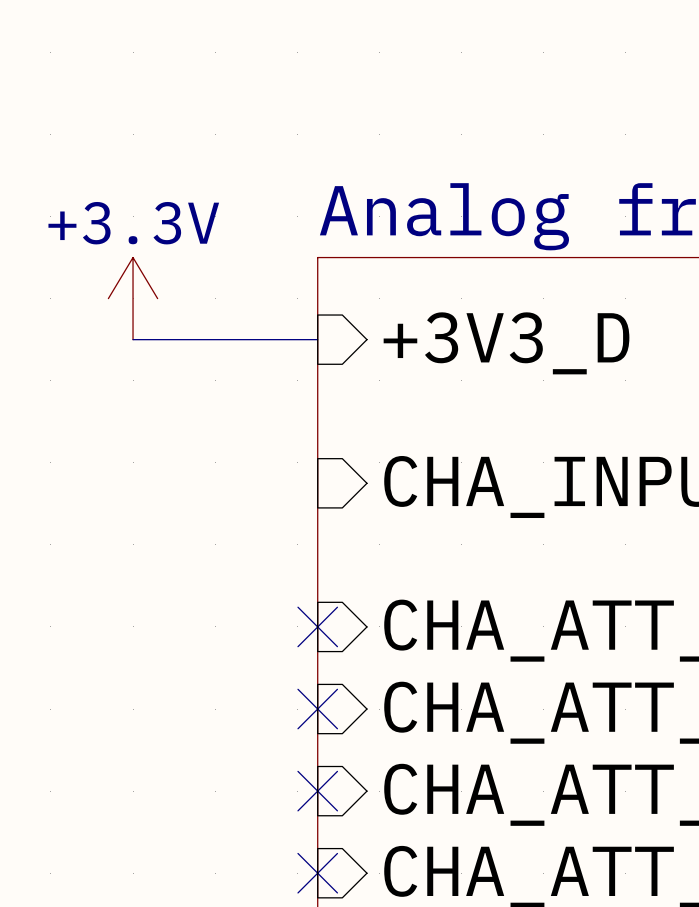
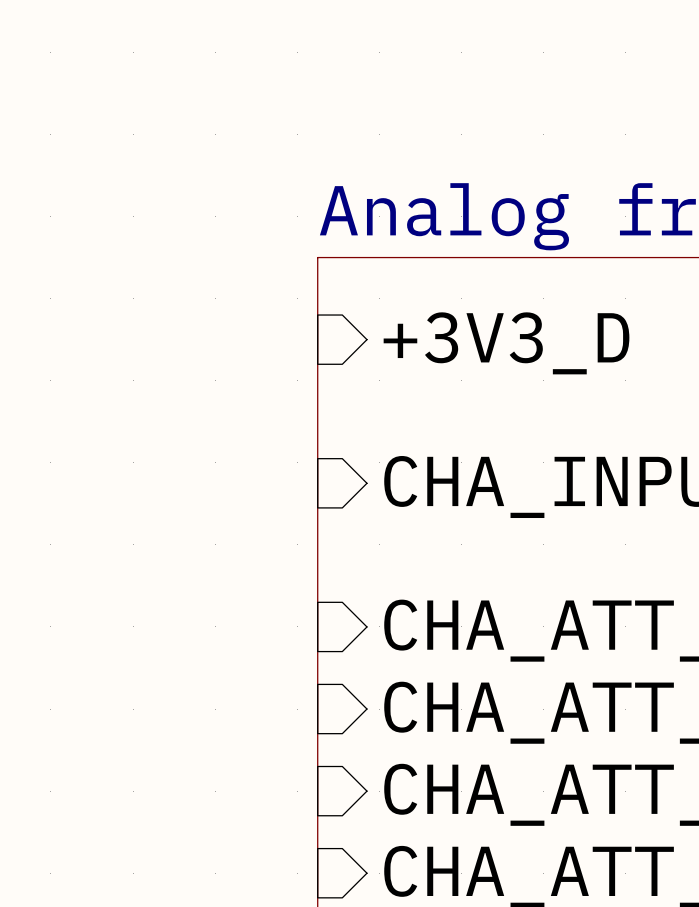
power symbol: +3.3V (133, 298) -> none
wire: (133, 339) (317, 339) -> none
no-connect mark: (317, 626) -> none
no-connect mark: (317, 709) -> none
no-connect mark: (317, 791) -> none
no-connect mark: (317, 873) -> none

